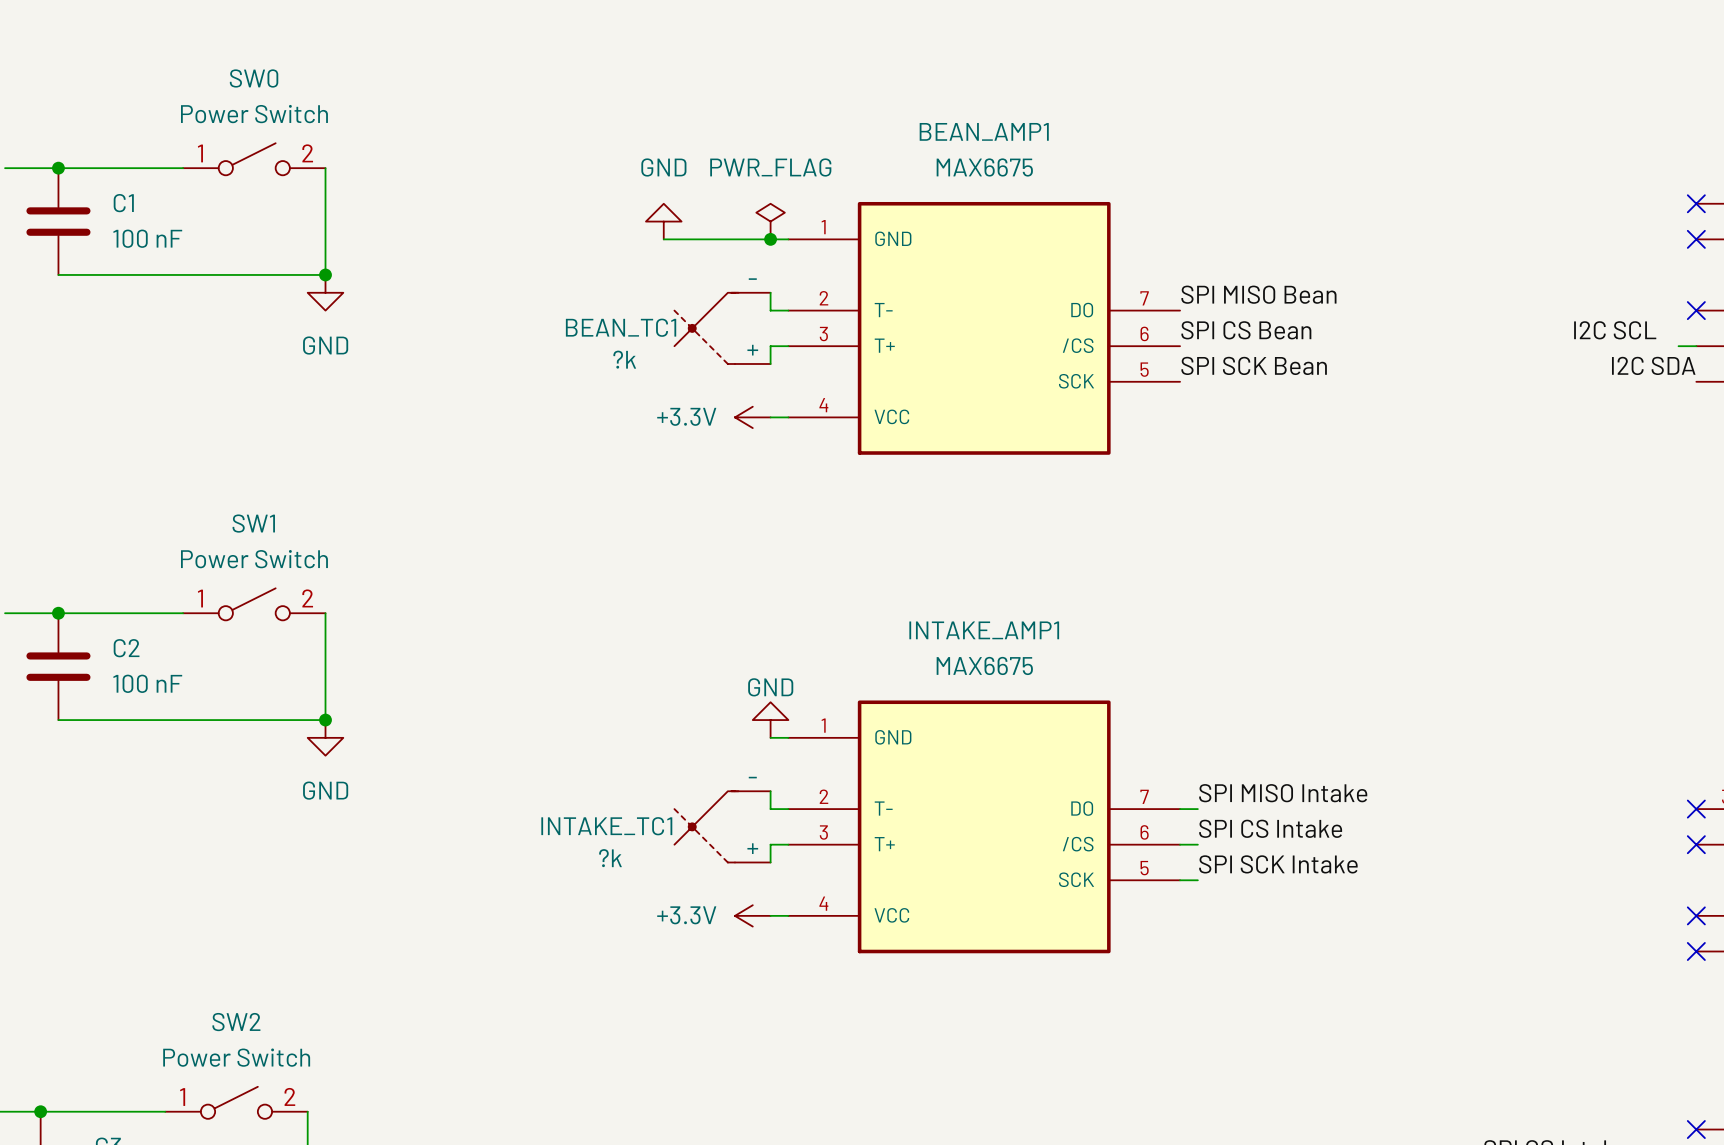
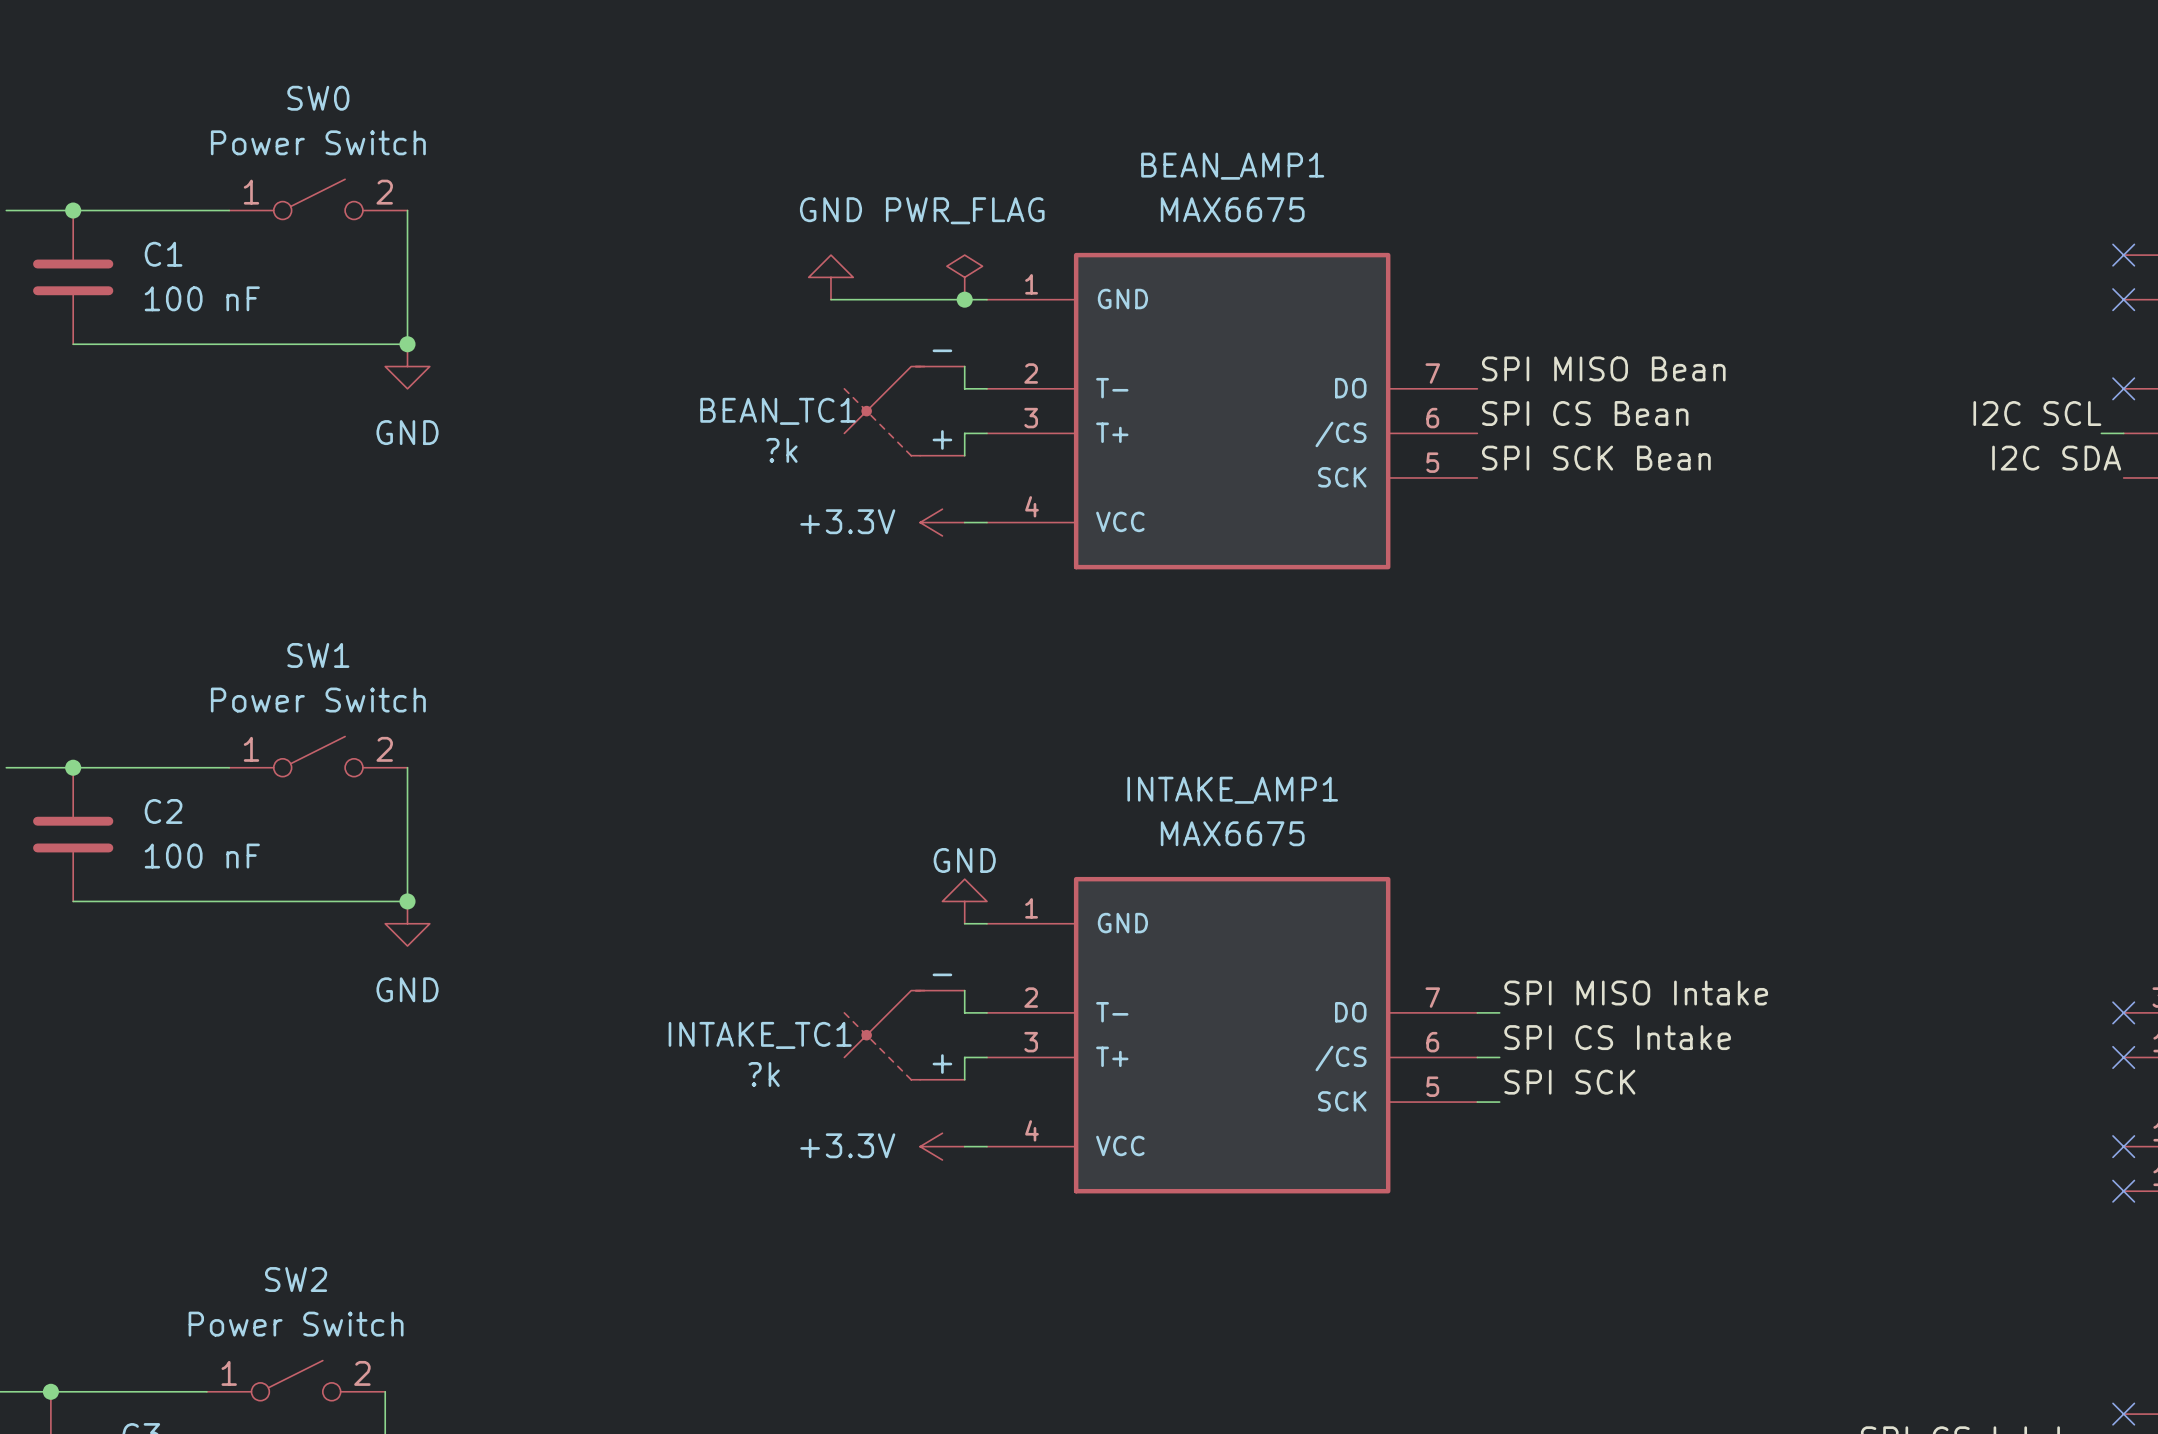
label: SPI SCK Intake (1278, 864) -> SPI SCK (1569, 1082)

